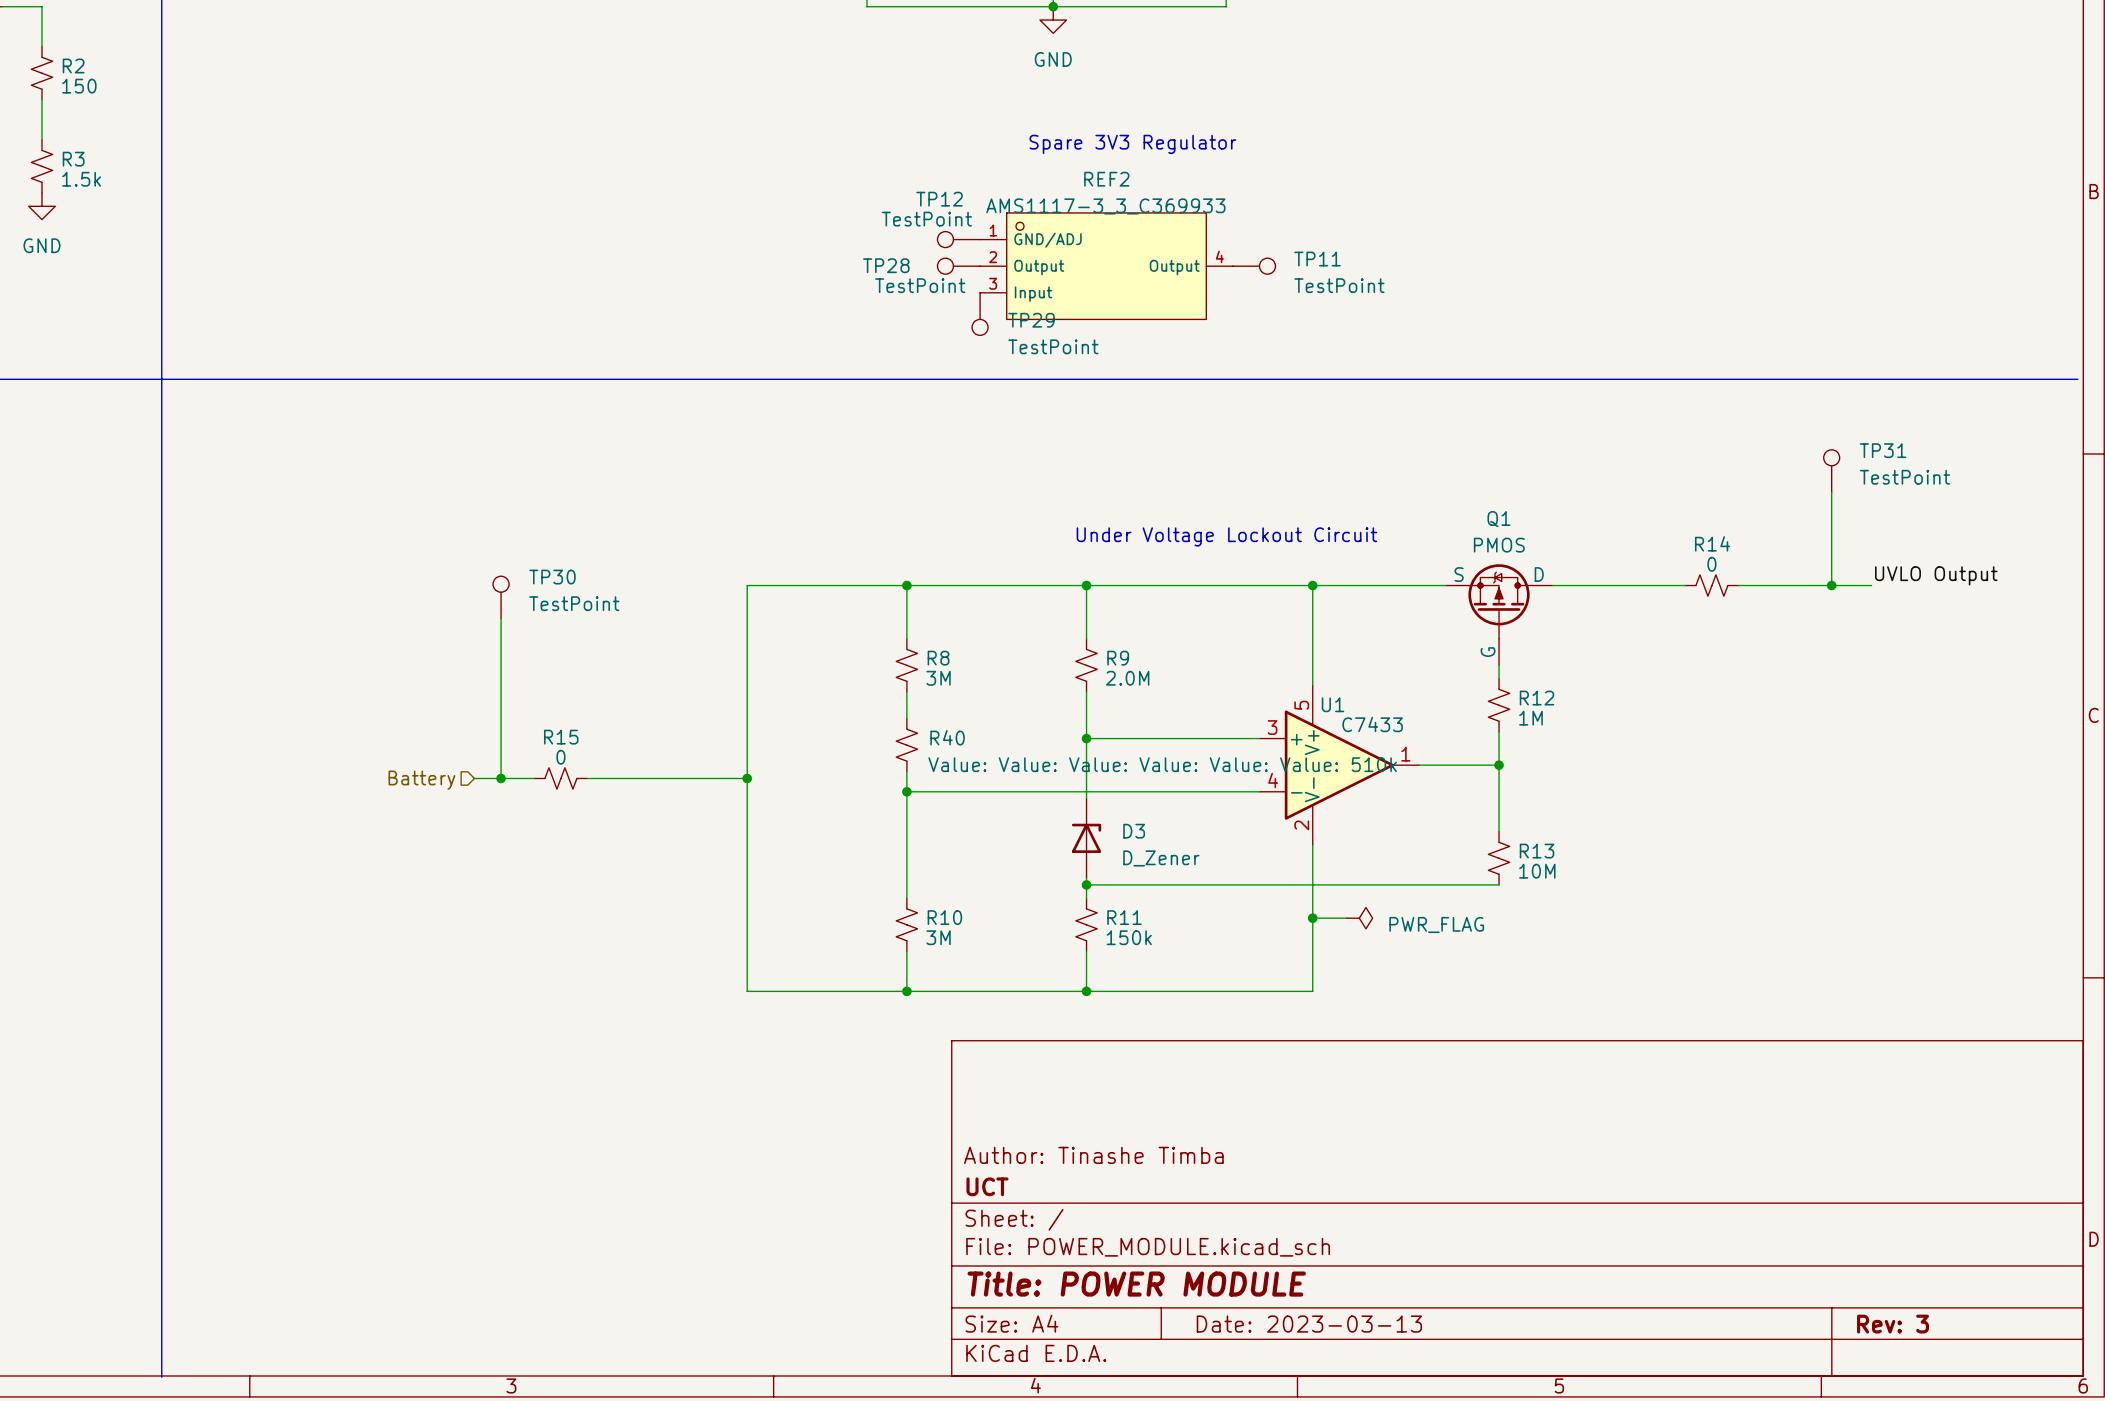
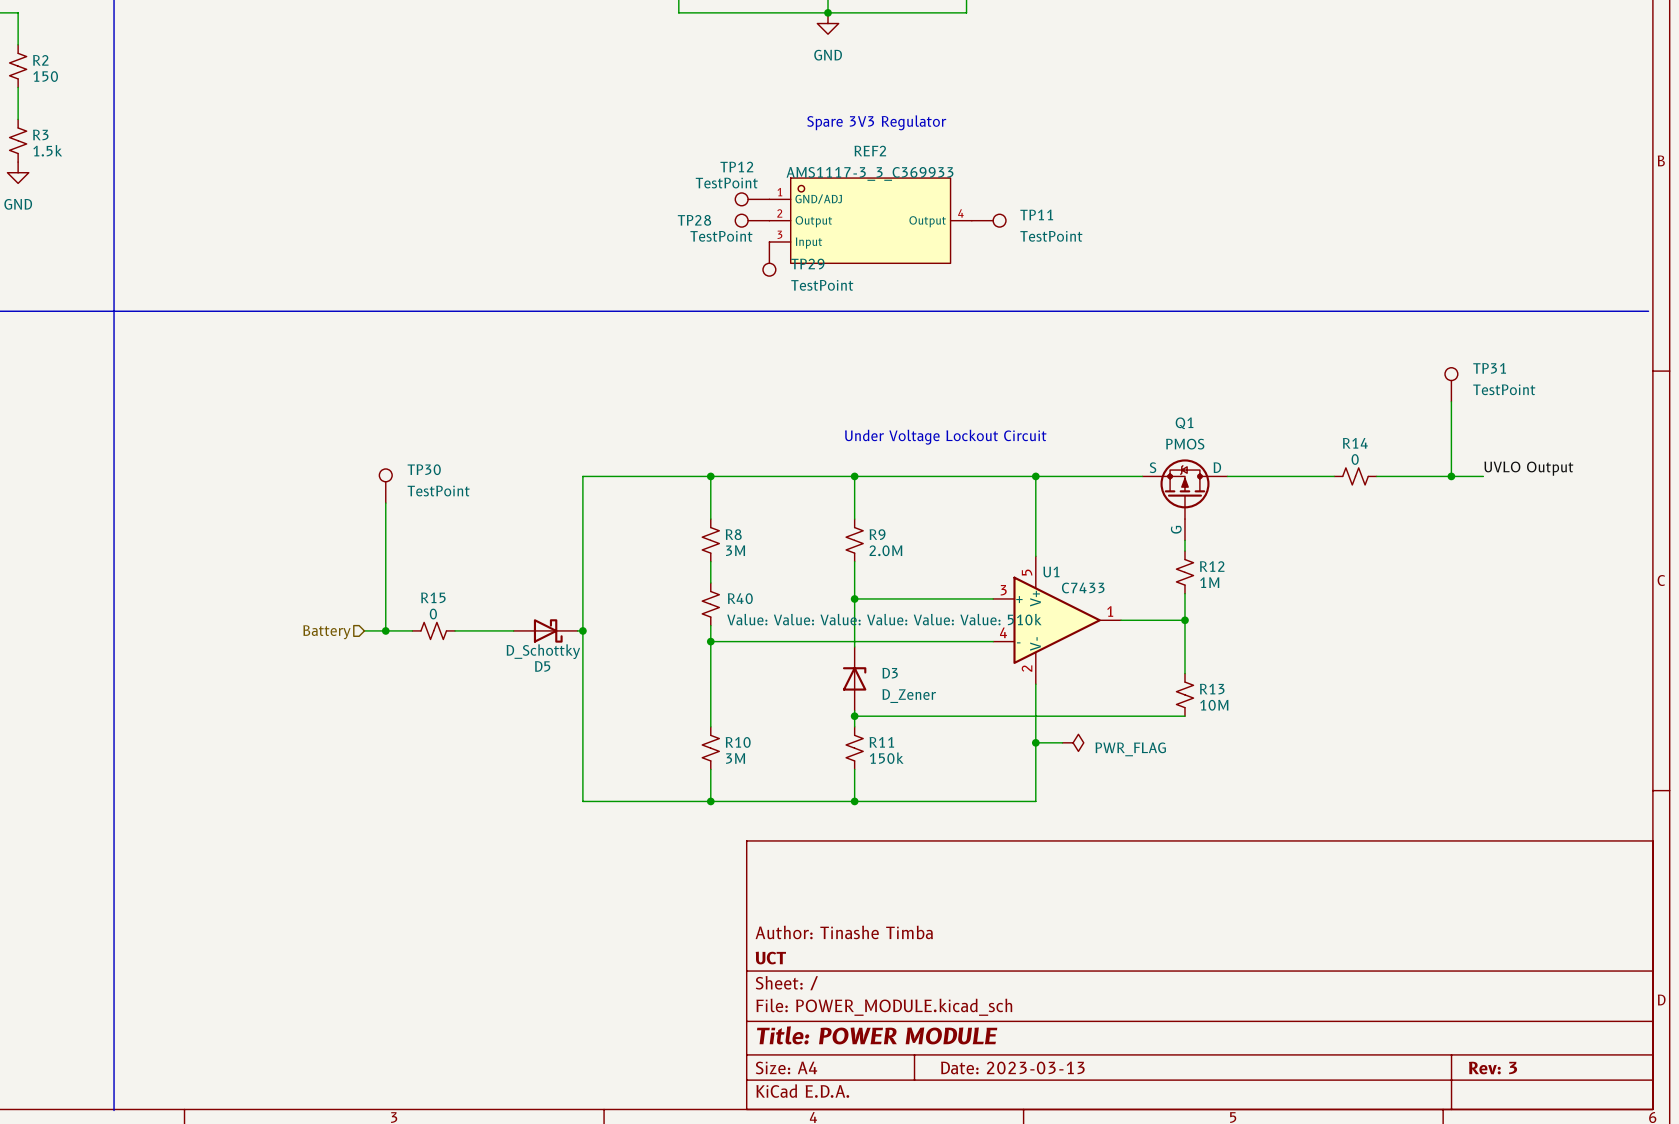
D5: none -> D_Schottky (545, 630)

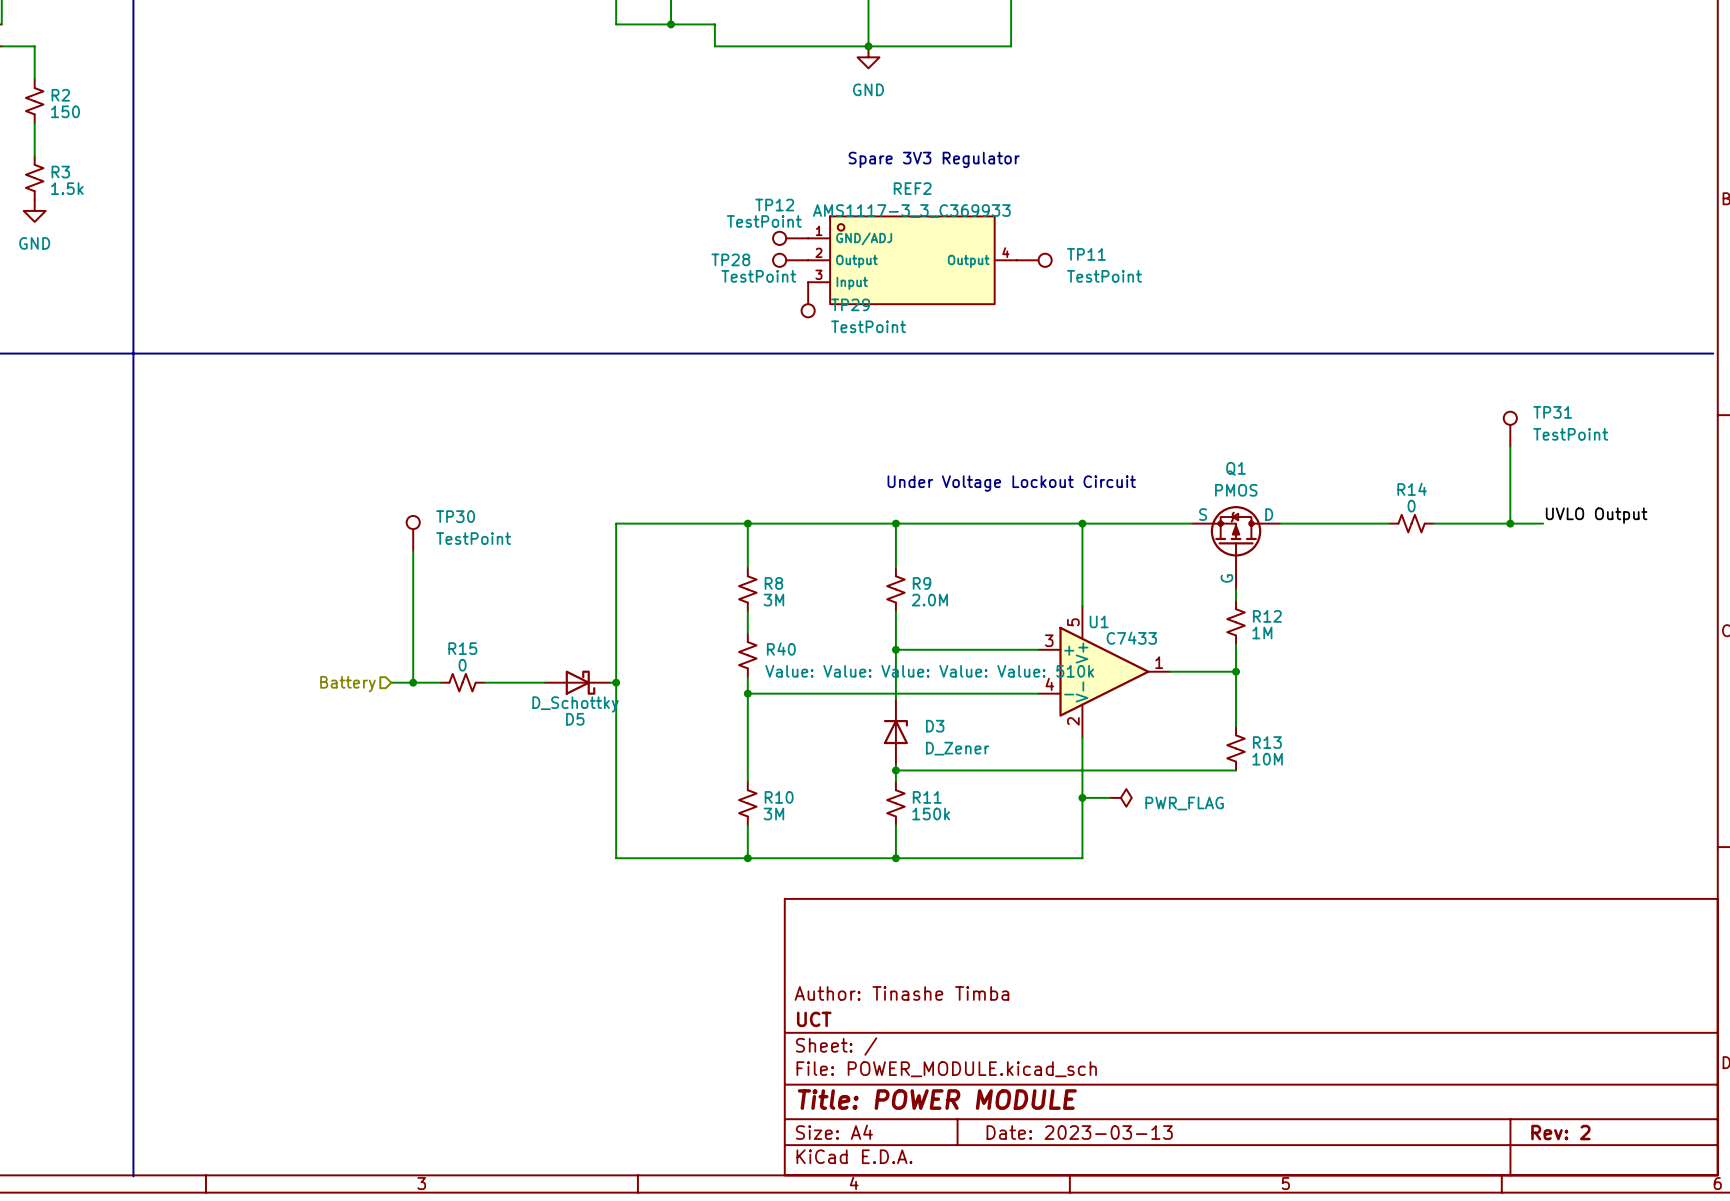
R40 value: Value: Value: Value: Value: Value: Value: 510k (884, 619) -> Value: Value: Value: Value: Value: 510k (929, 671)
title block: Rev: 3 (1493, 1068) -> Rev: 2 (1560, 1132)

